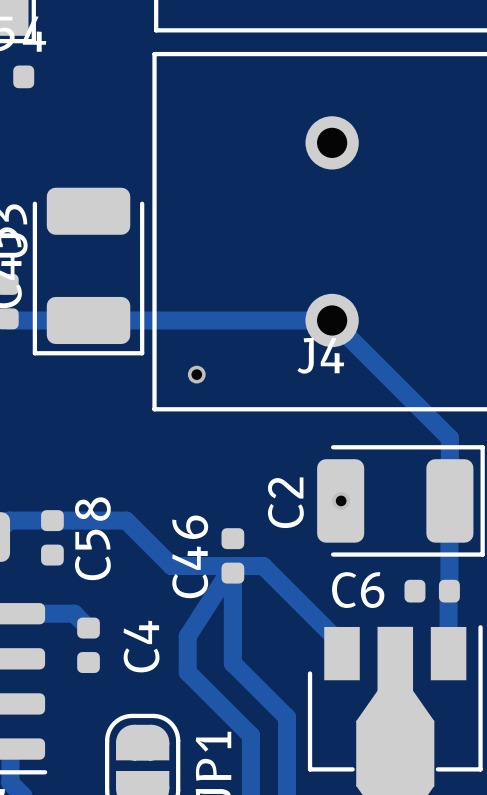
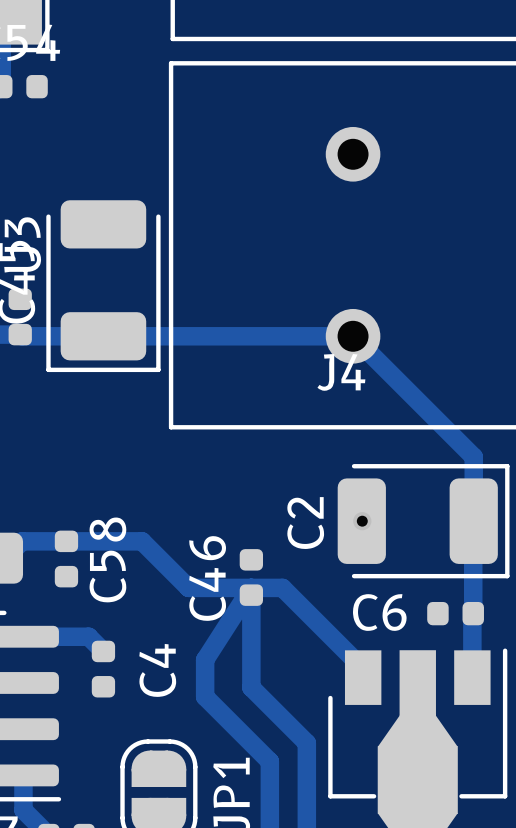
via: (196, 374) -> none

